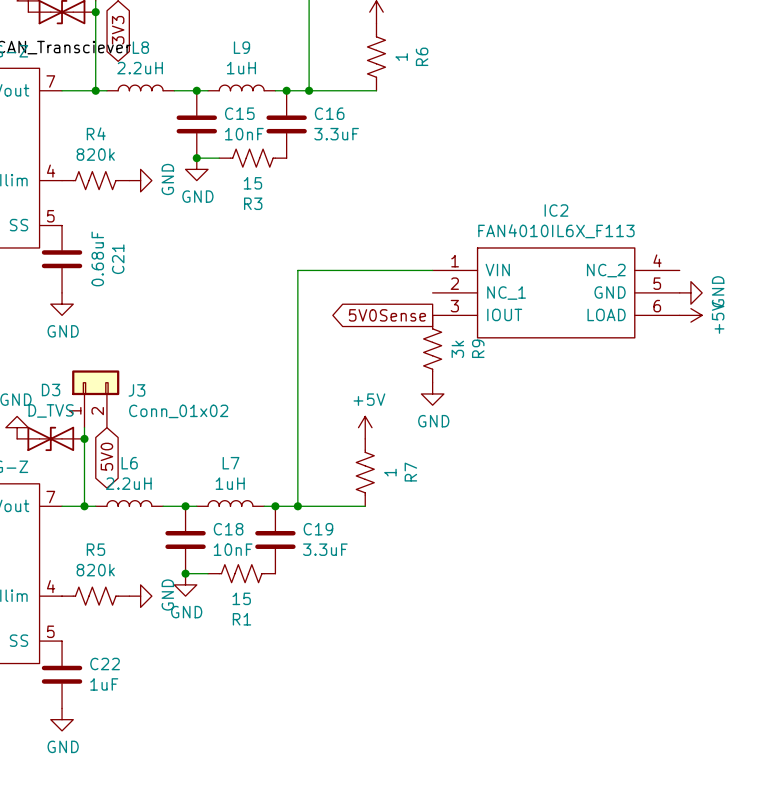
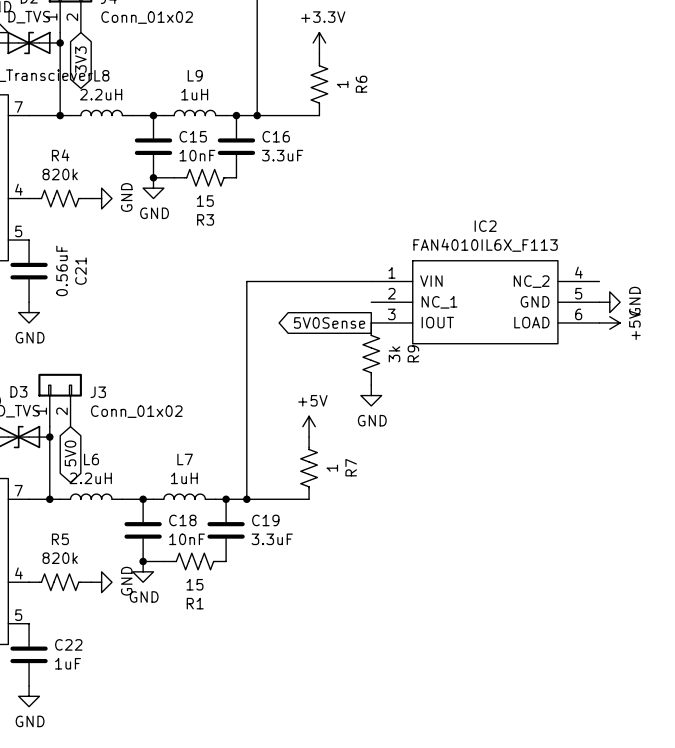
C21 value: 0.68uF (97, 258) -> 0.56uF (62, 270)

